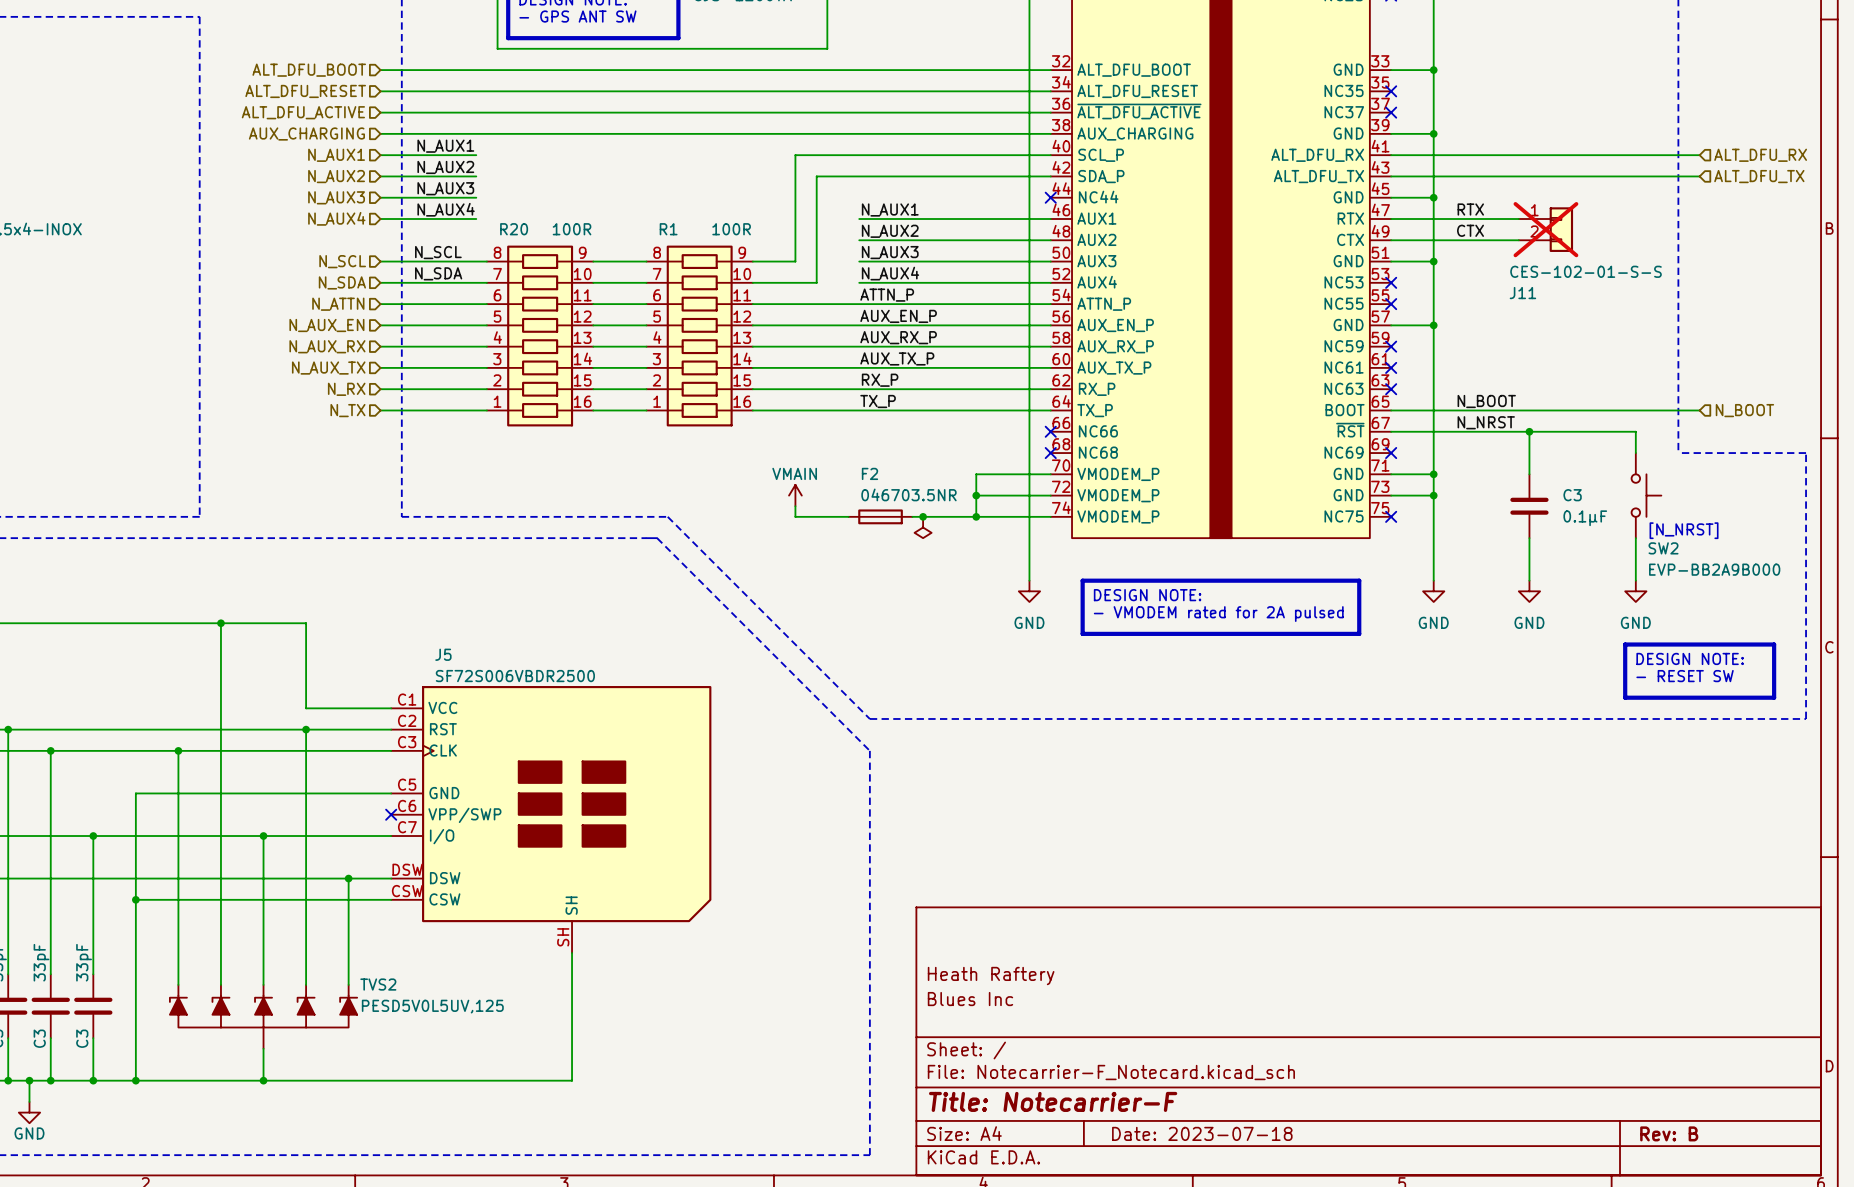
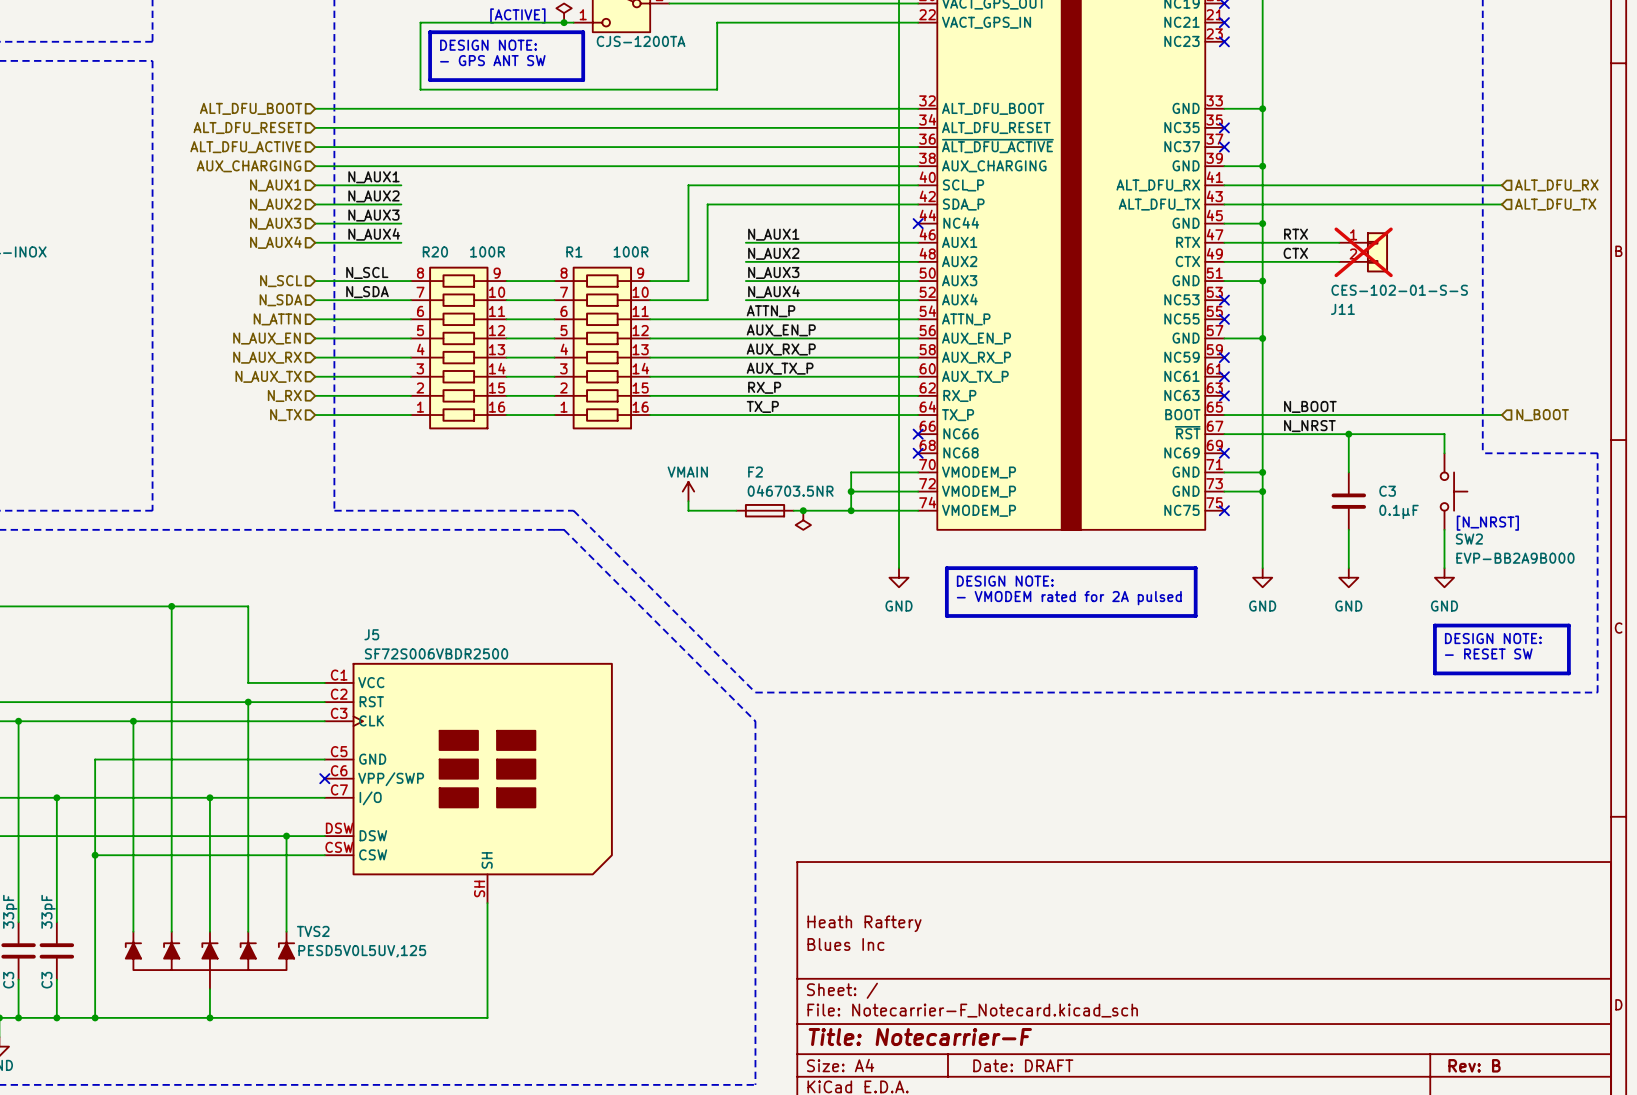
title block: Date: 2023-07-18 (1202, 1133) -> Date: DRAFT (1023, 1065)

